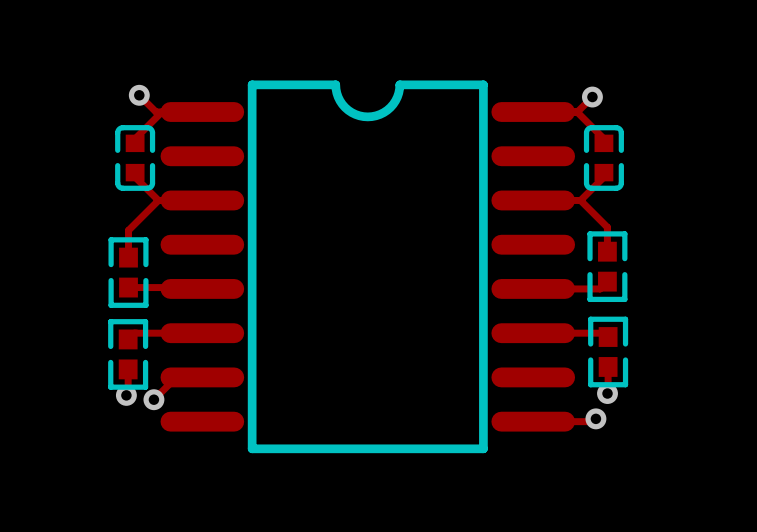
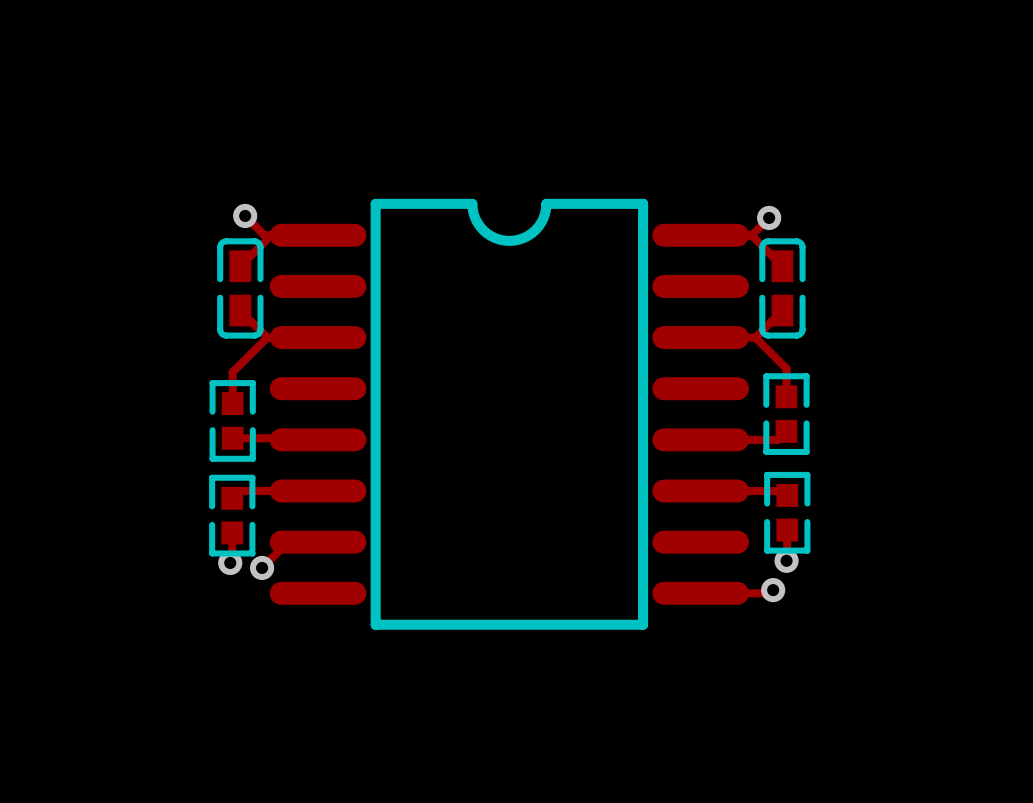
part footprint: [115, 125, 156, 191] -> [217, 238, 264, 339]
part footprint: [583, 125, 624, 191] -> [759, 238, 806, 339]

